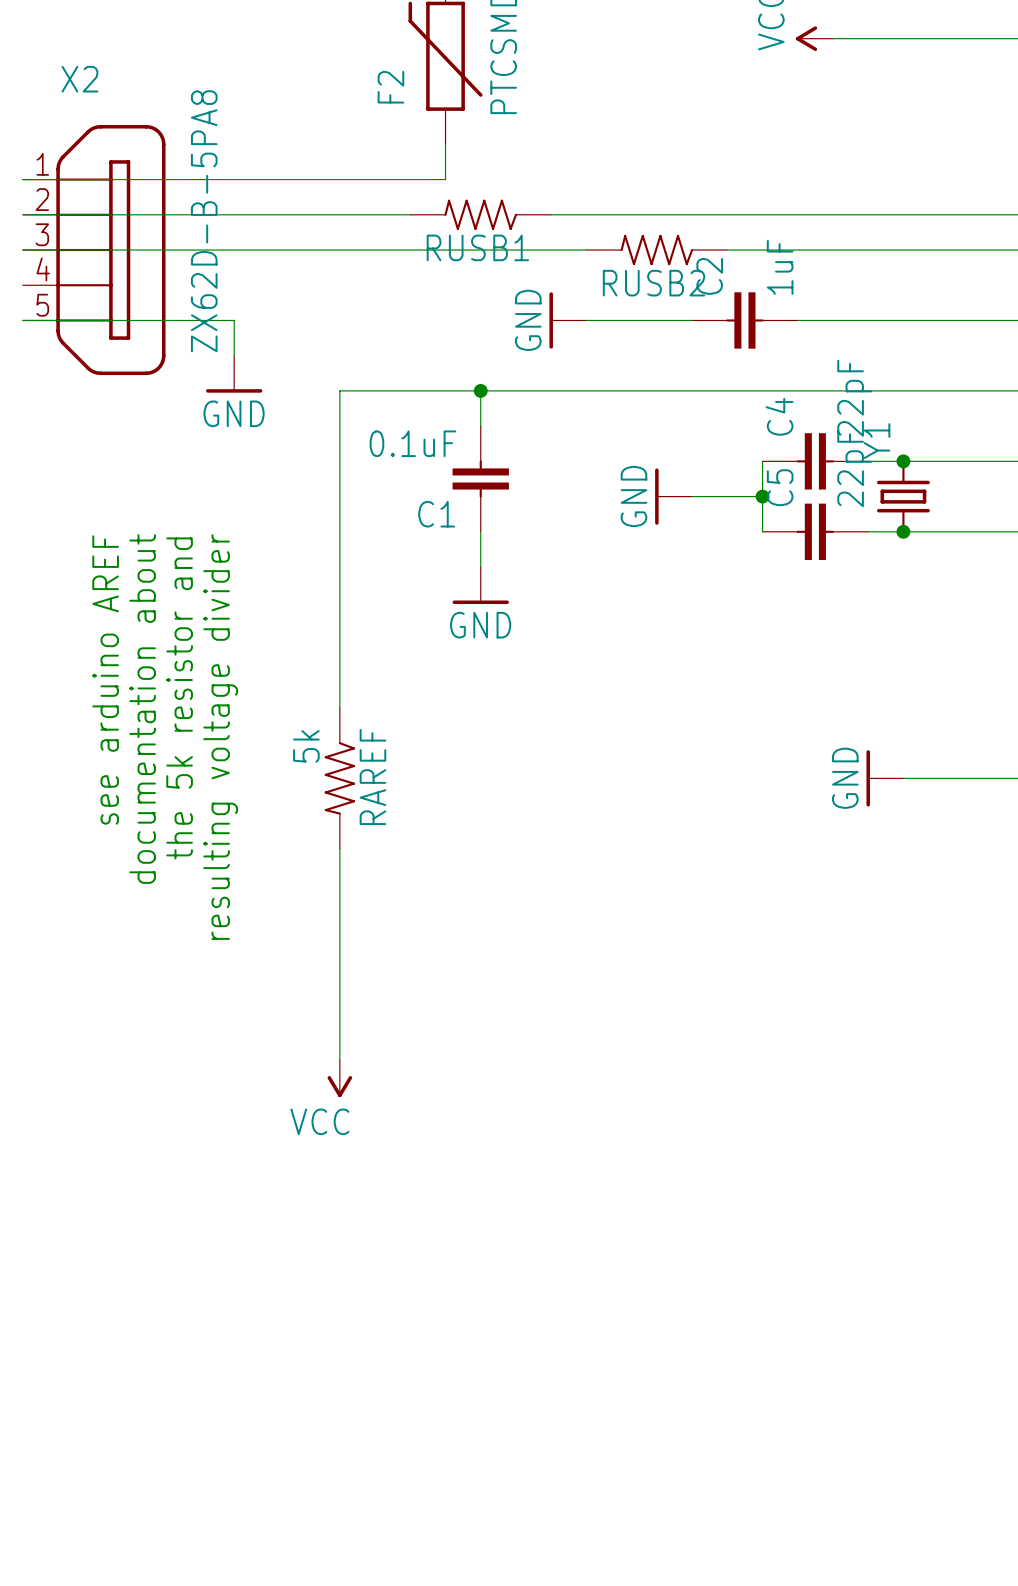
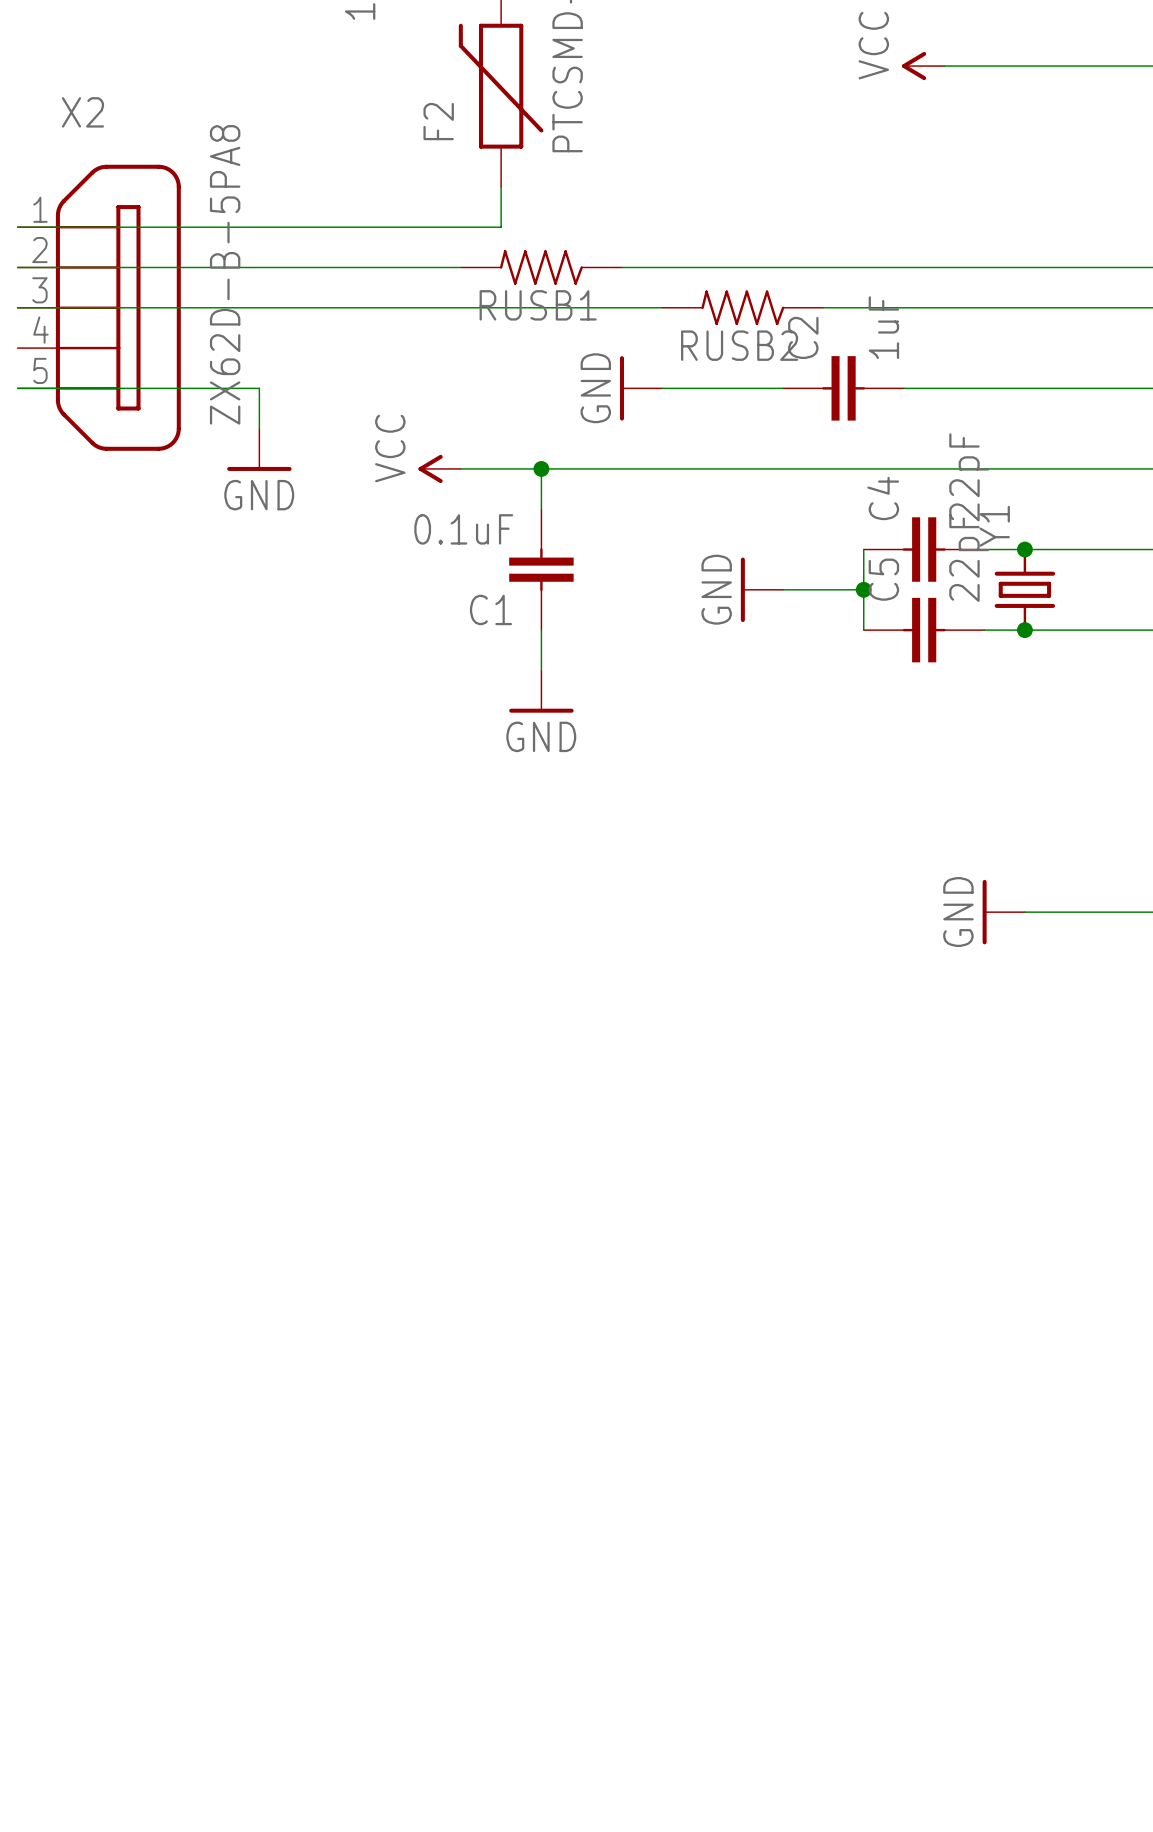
power symbol: none -> VCC (439, 468)
wire: (410, 390) (339, 390) (339, 707) -> none
text: see arduino AREF (105, 679) -> none
text: the 5k resistor and (179, 698) -> none
text: documentation about (142, 709) -> none
text: resulting voltage divider (220, 737) -> none
RAREF: 5k (339, 778) -> none
wire: (339, 848) (339, 1060) -> none
power symbol: VCC (339, 1078) -> none

